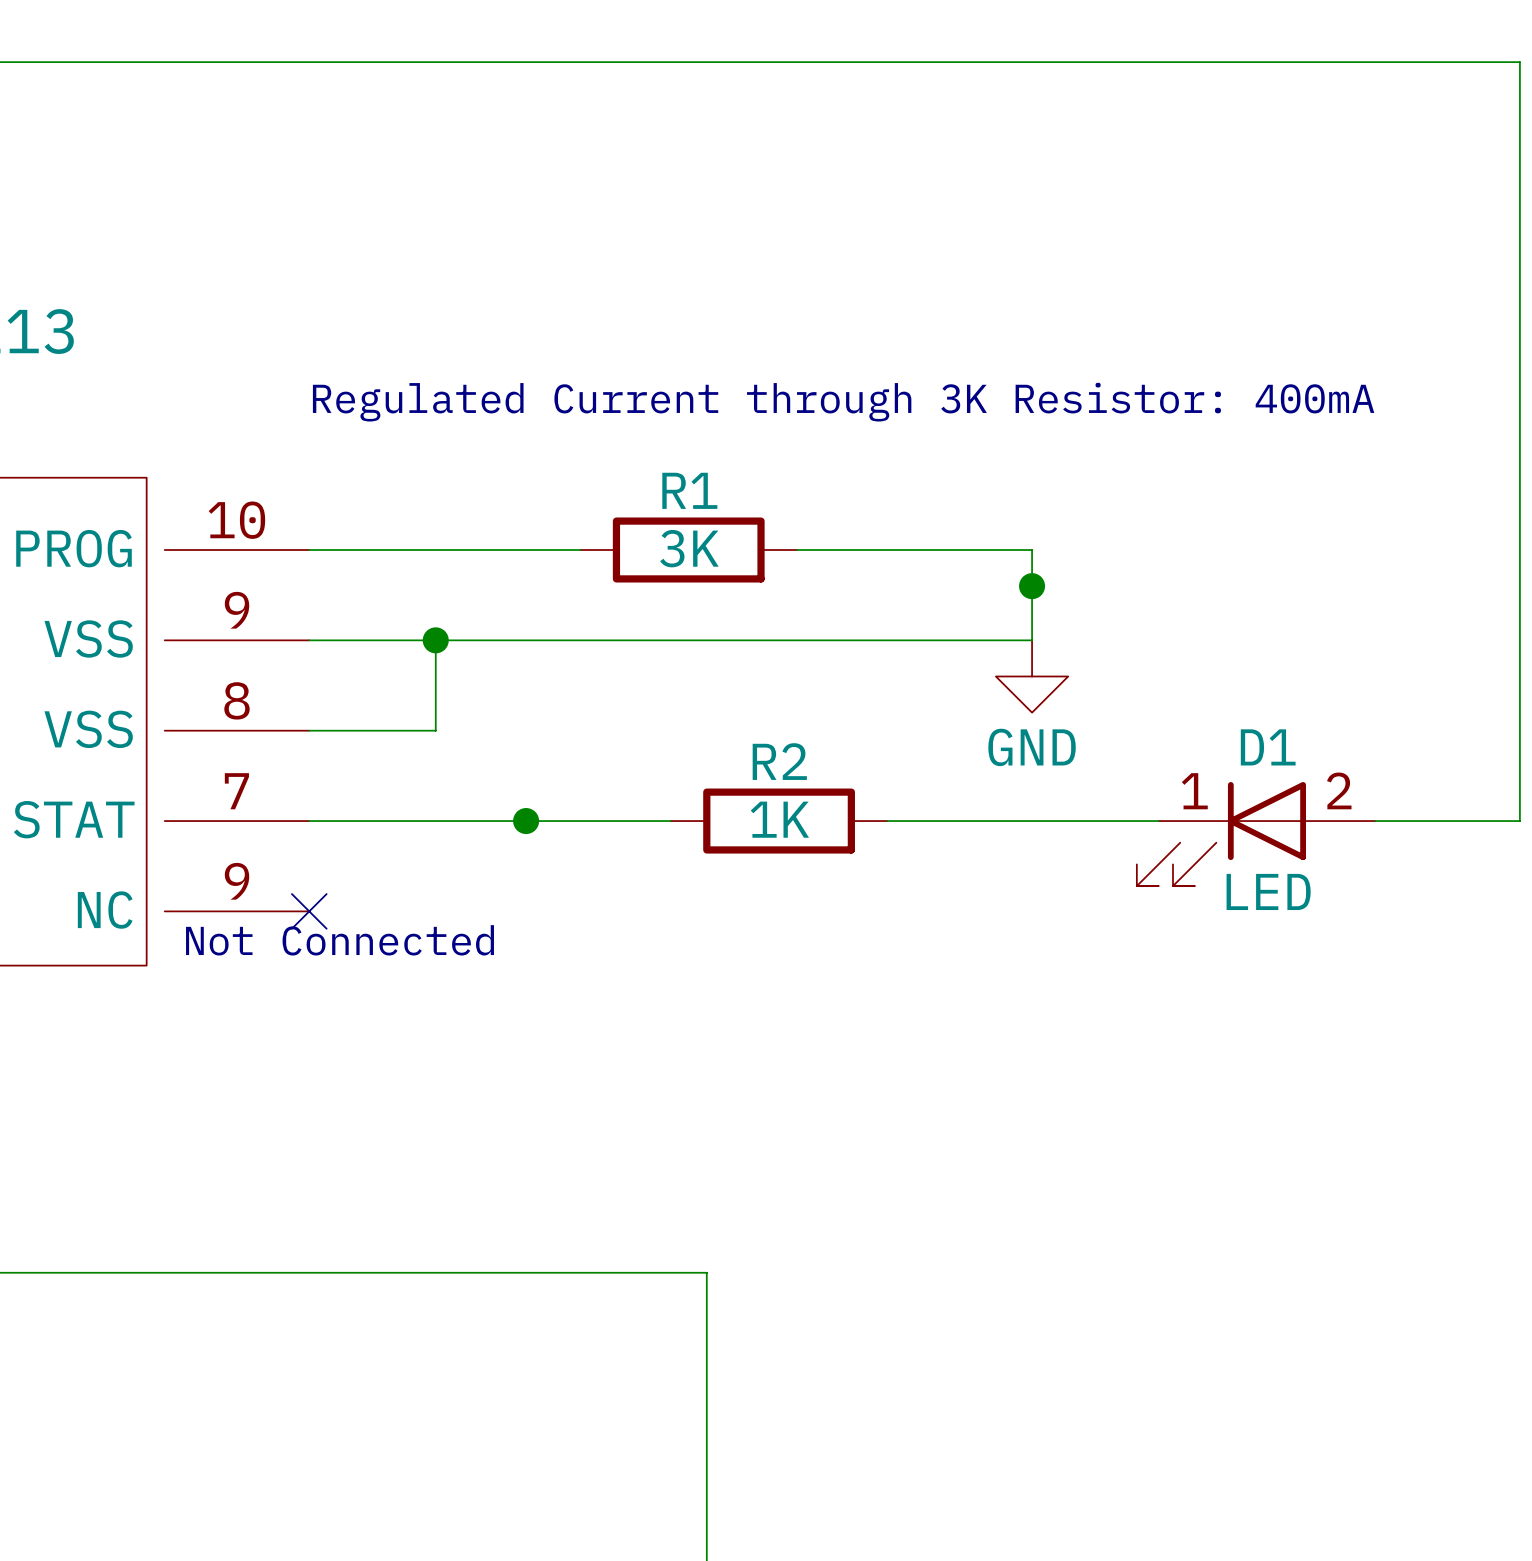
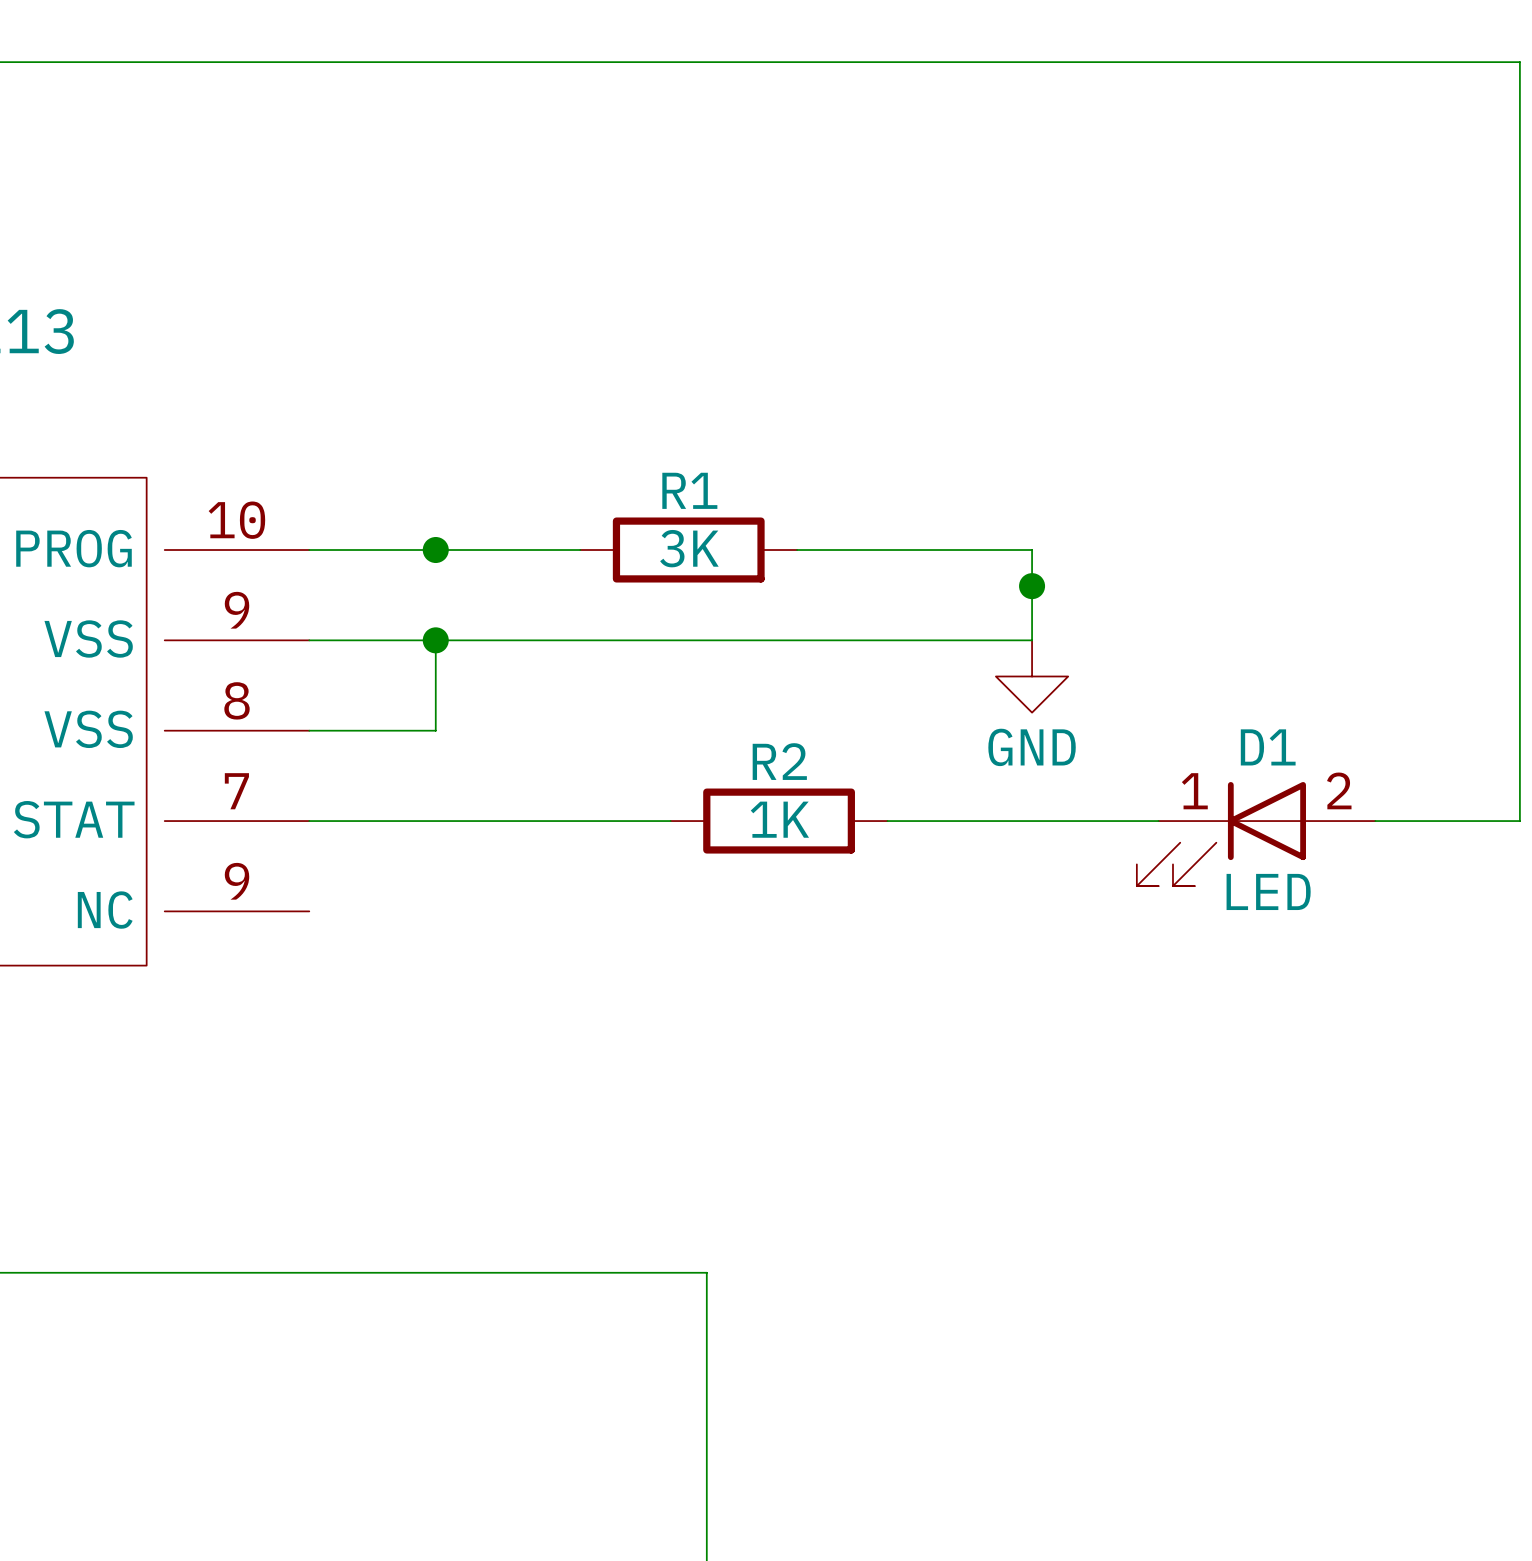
text: Regulated Current through 3K Resistor: 400mA (843, 402) -> none
junction: none -> (435, 550)
junction: (526, 821) -> none
no-connect mark: (309, 911) -> none
text: Not Connected (340, 940) -> none

